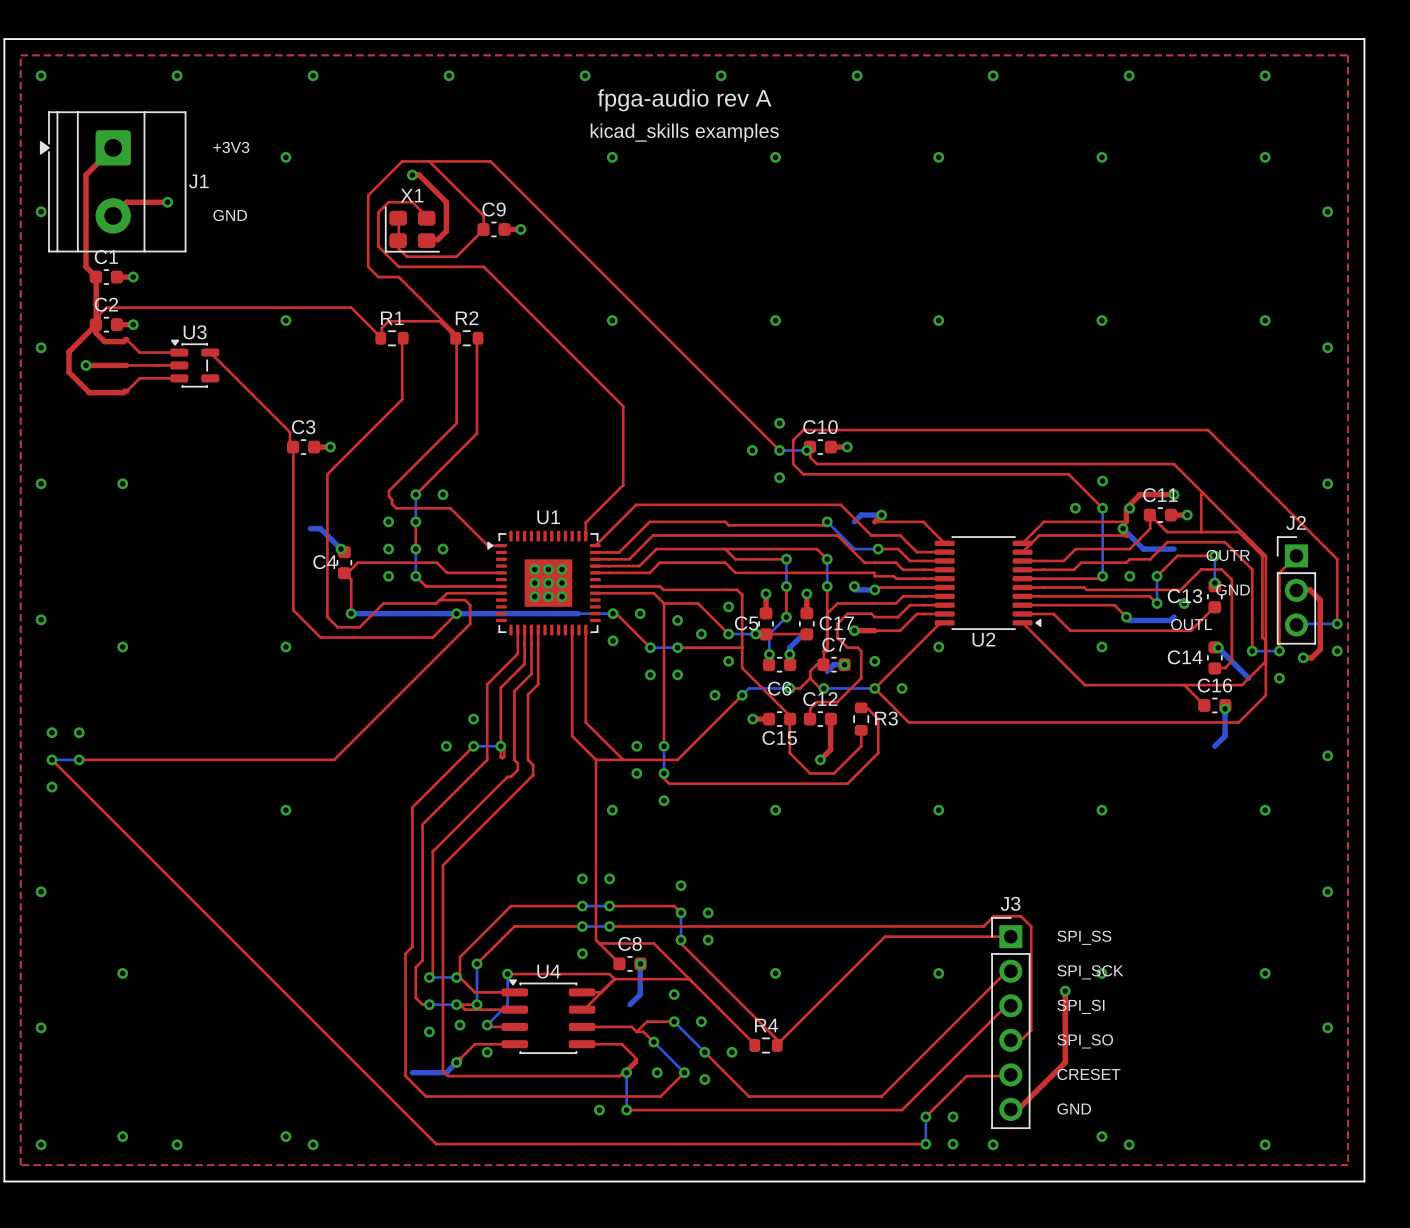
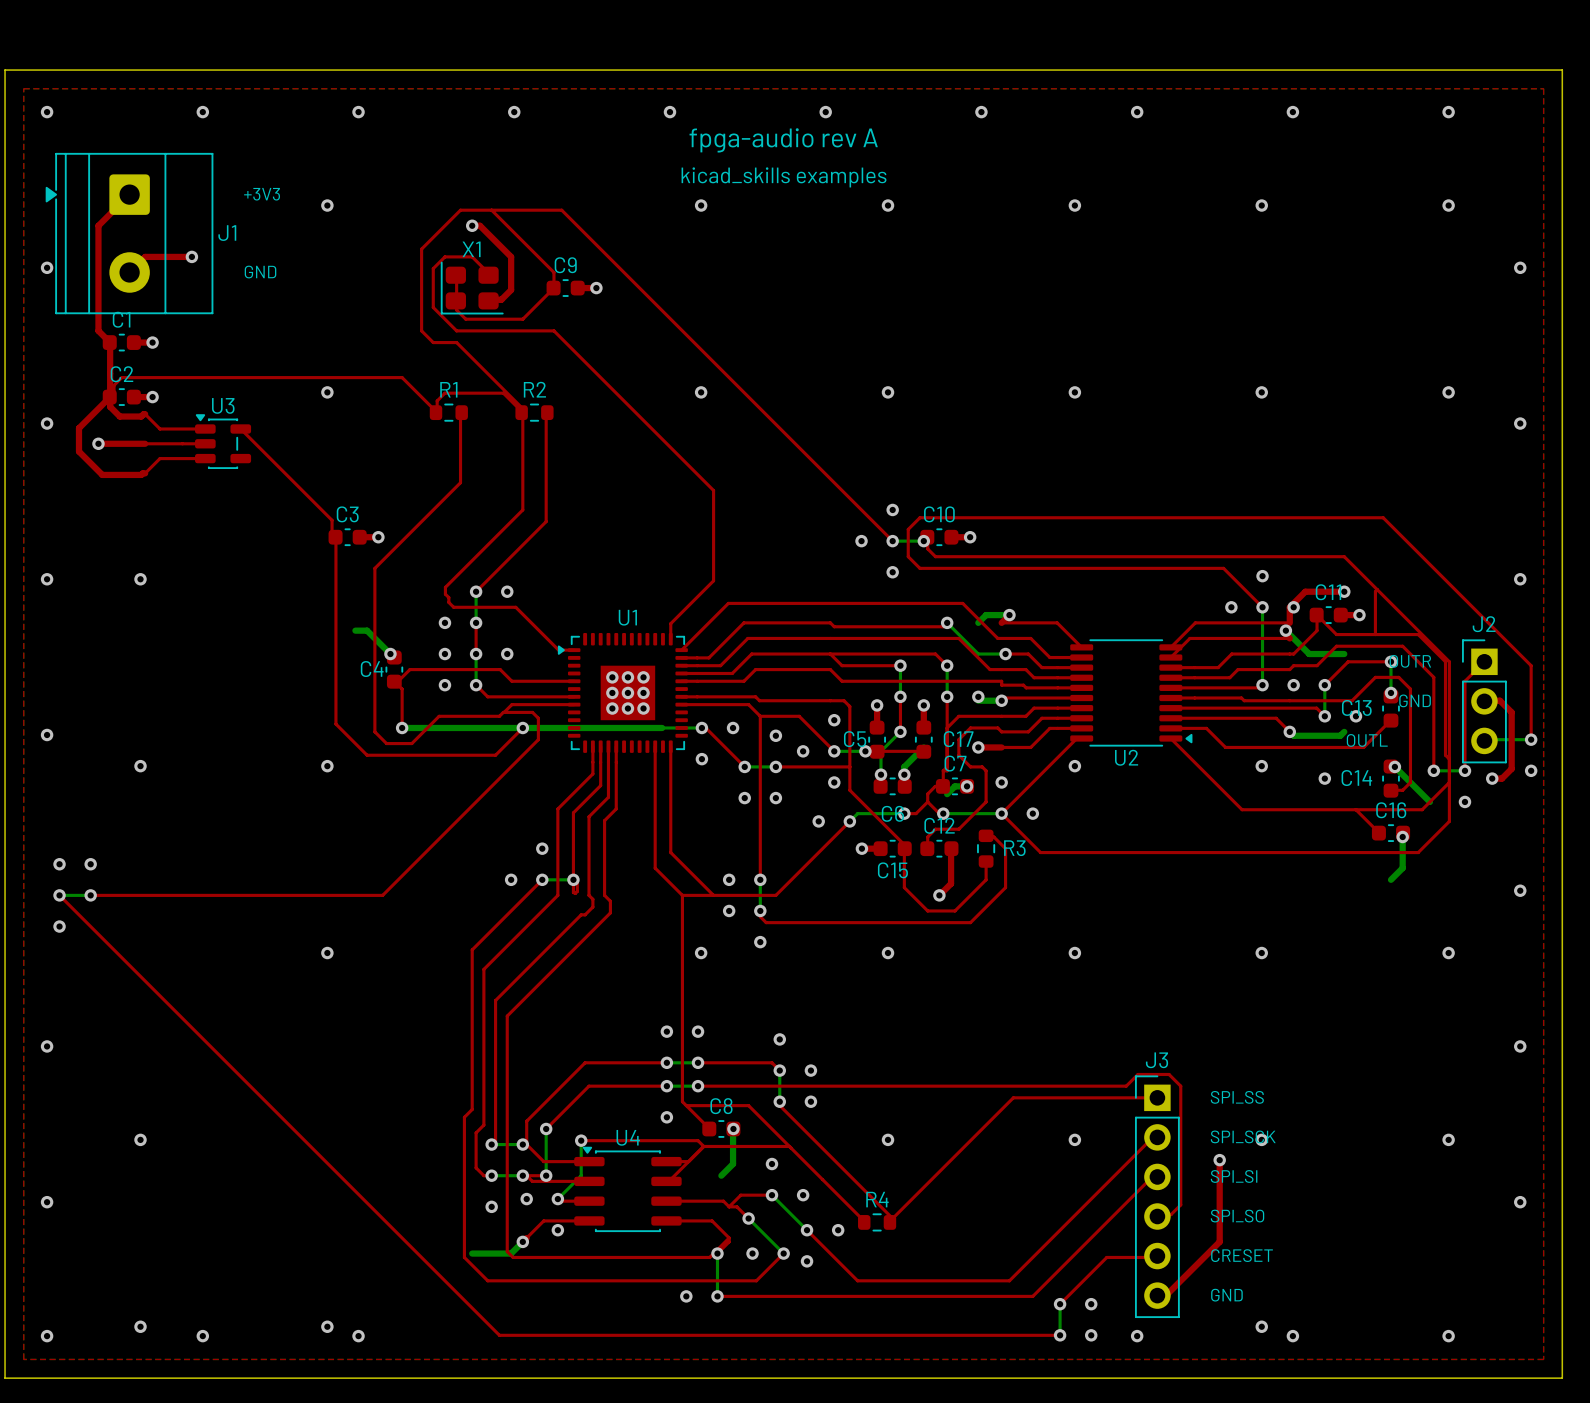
via: none -> (1324, 778)

